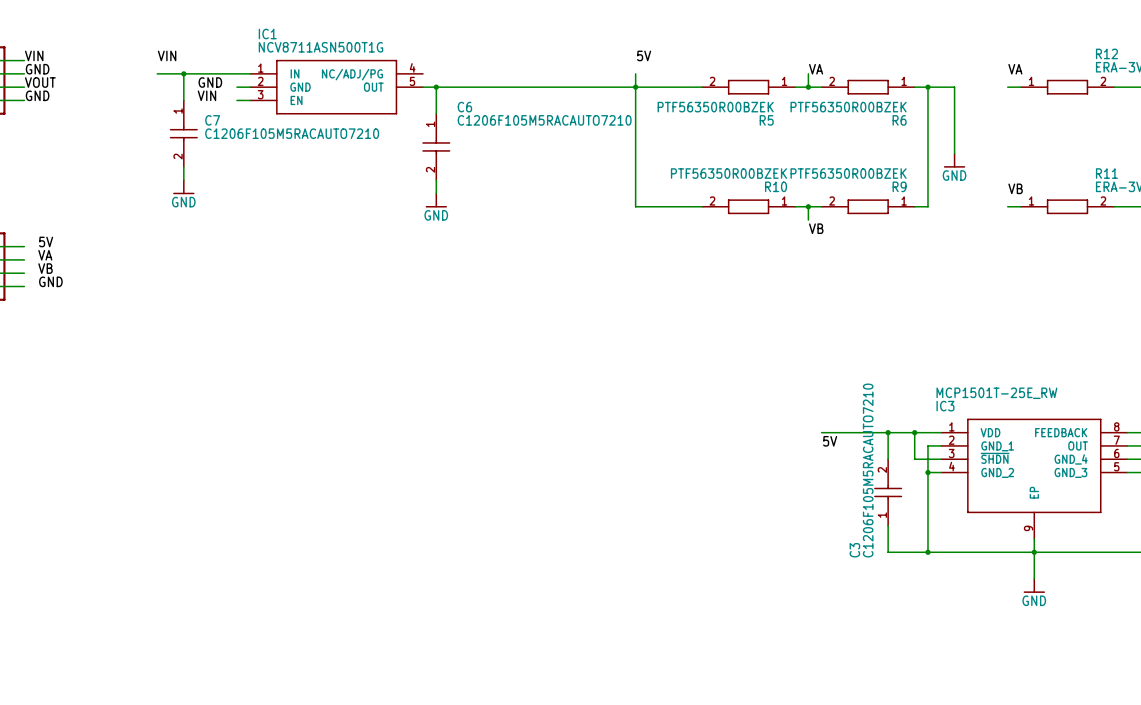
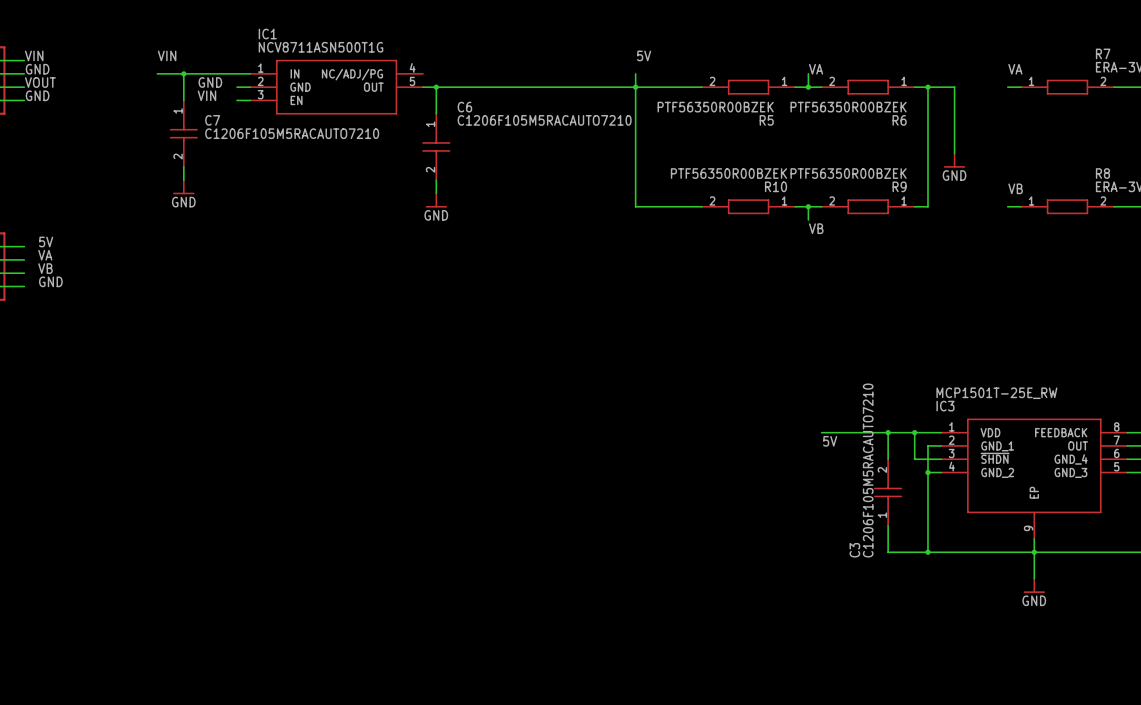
R12 name: R12 (1106, 53) -> R7 (1103, 53)
R11 name: R11 (1106, 173) -> R8 (1102, 173)

